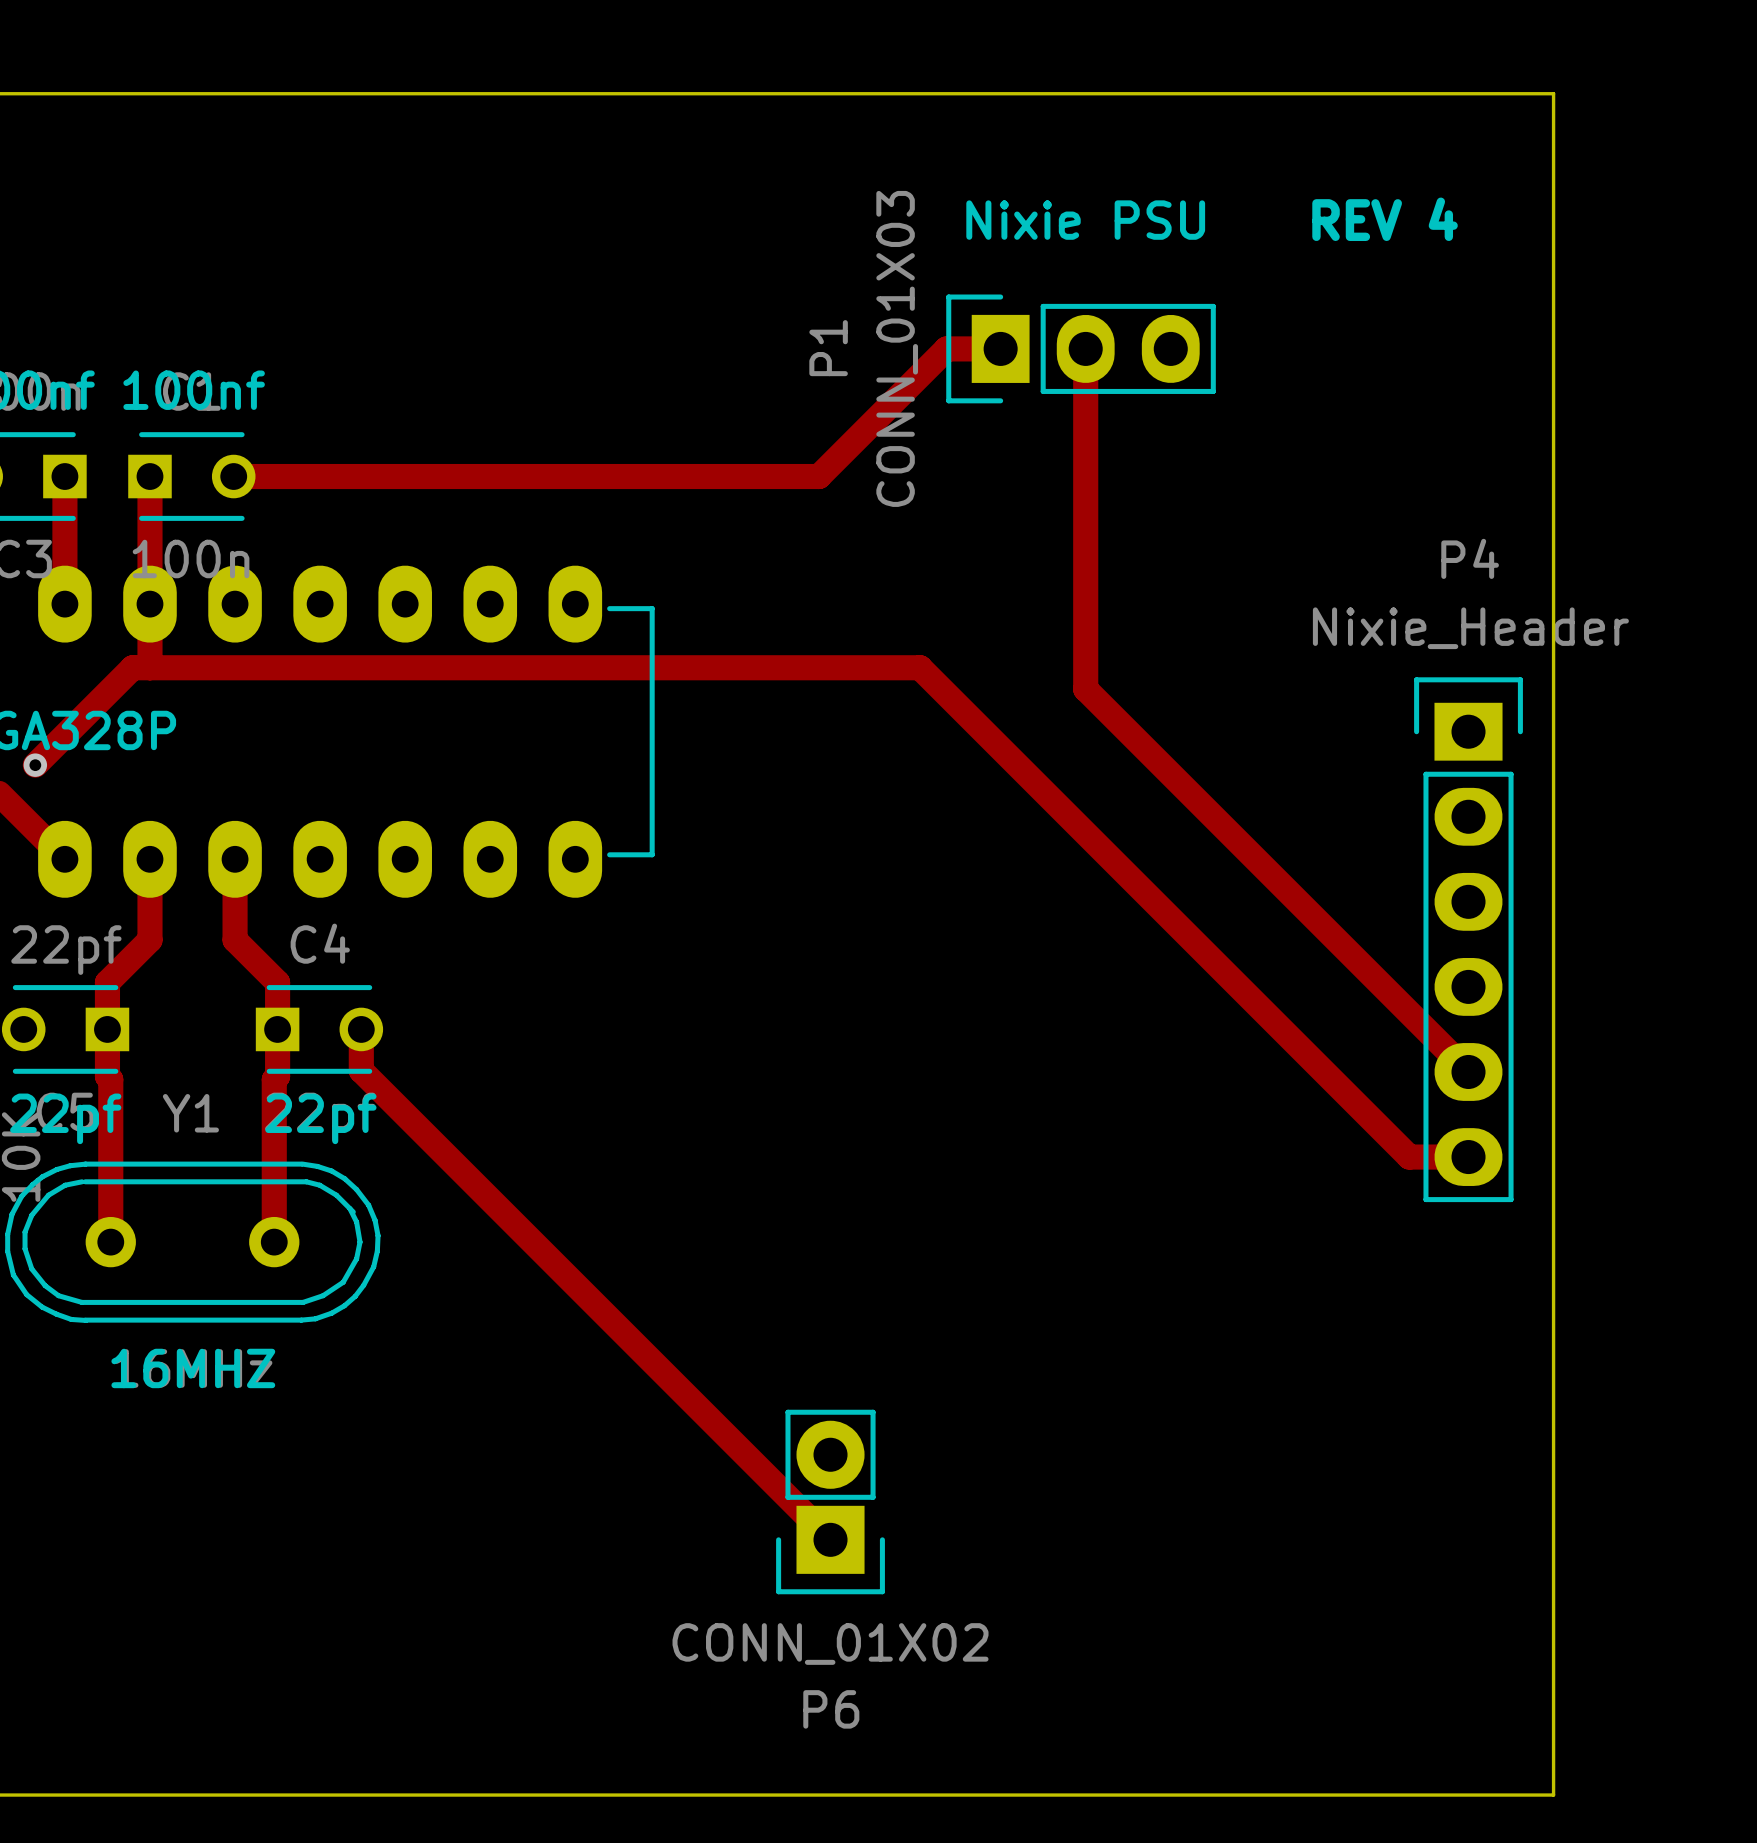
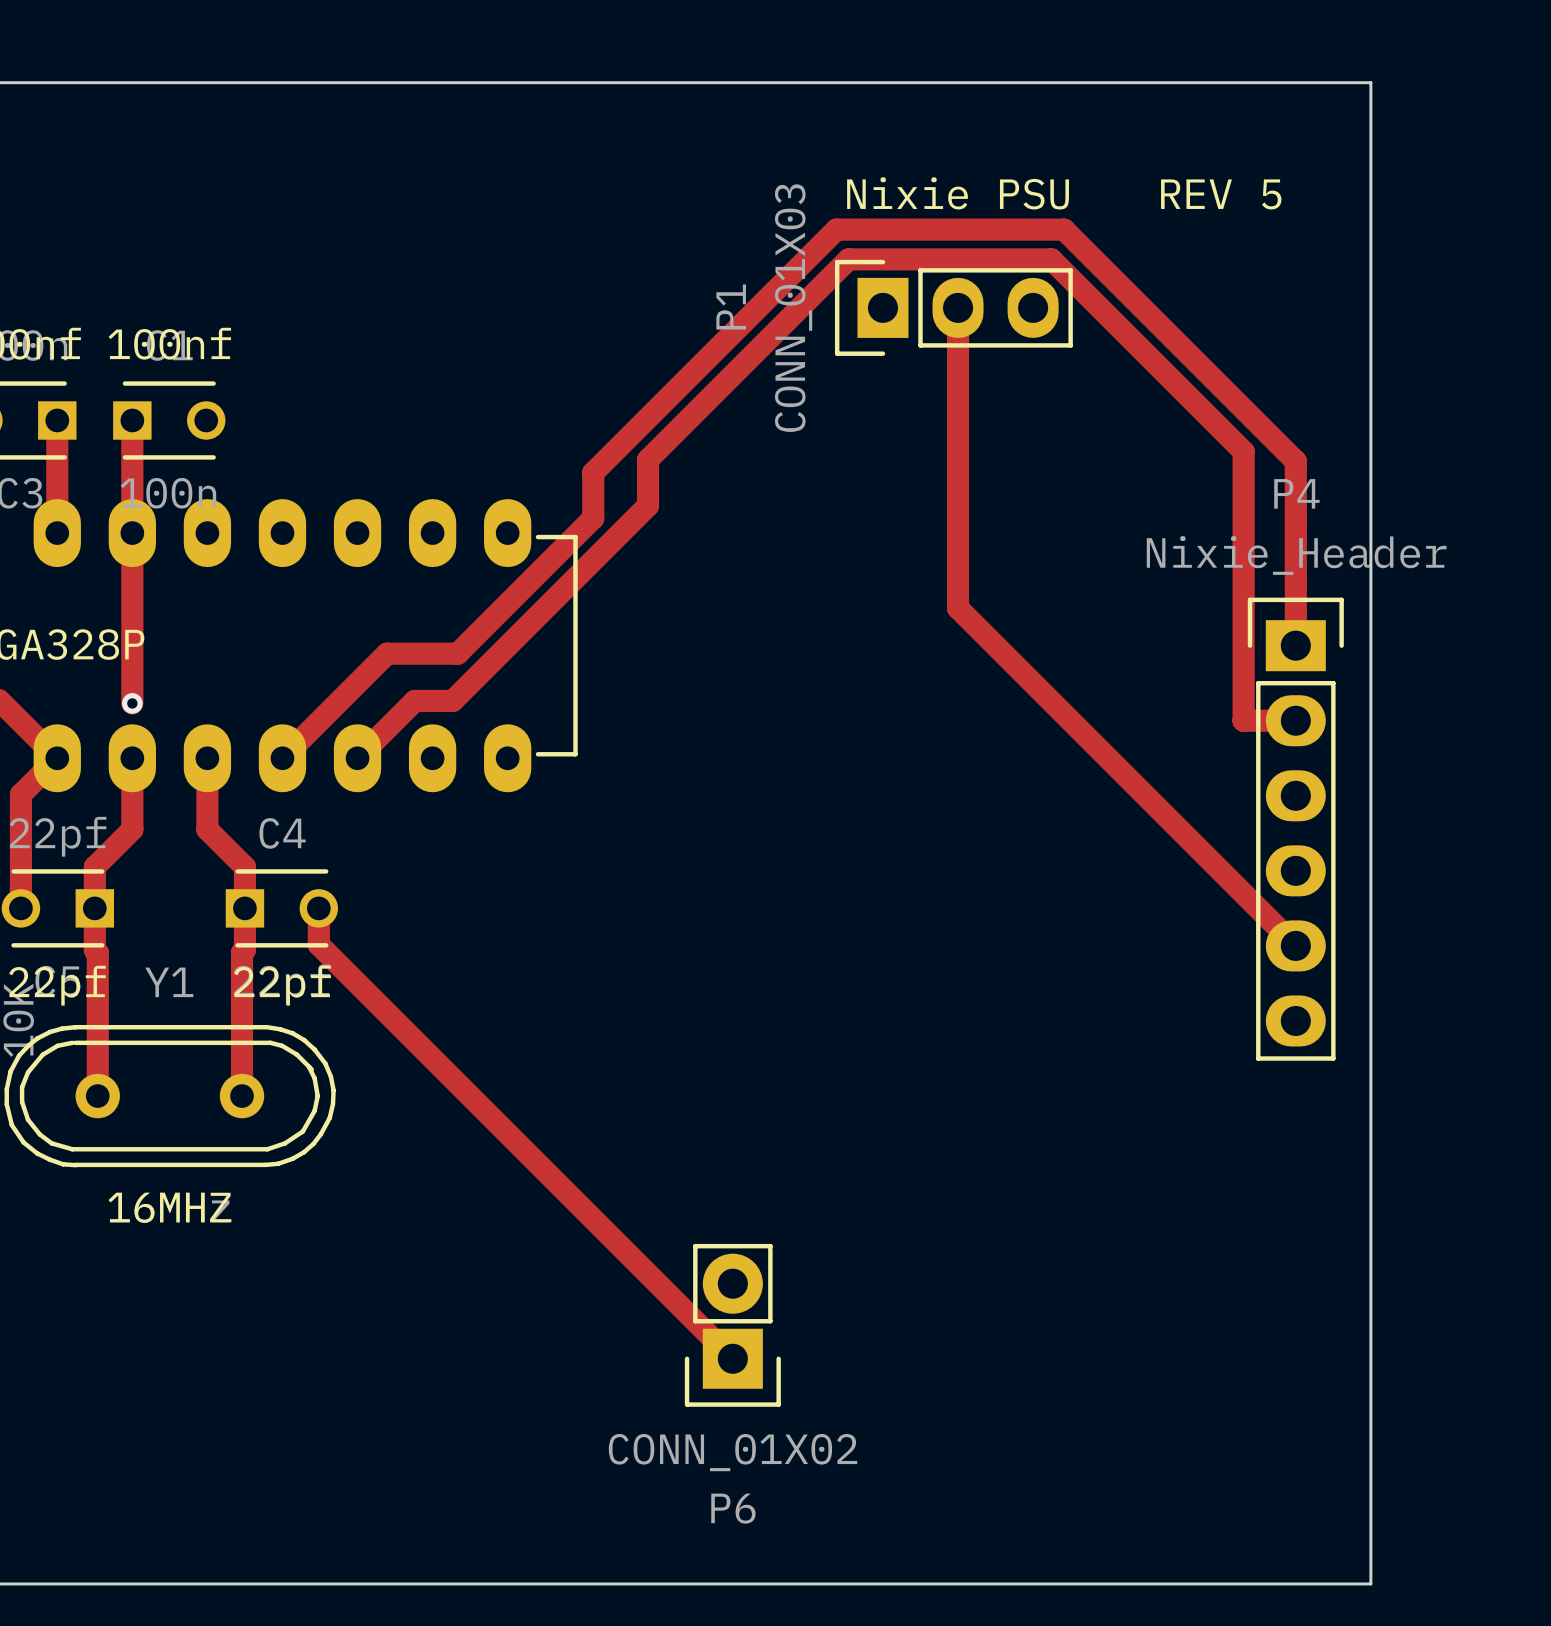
text: REV 4 (1385, 219) -> REV 5 (1221, 194)
track: (1000, 348) (946, 348) (819, 476) (233, 476) -> none
track: none -> (132, 589) (132, 703)
track: none -> (1295, 645) (1295, 461) (1064, 229) (836, 229) (593, 472) (593, 518) (457, 653) (387, 653) (282, 758)
track: (35, 765) (132, 667) (920, 667) (1409, 1157) (1468, 1157) -> none
via position: (35, 765) -> (132, 703)
track: none -> (1295, 720) (1243, 720) (1243, 451) (1051, 259) (848, 259) (648, 459) (648, 505) (452, 700) (414, 700) (357, 758)
track: none -> (57, 758) (20, 794) (20, 908)

